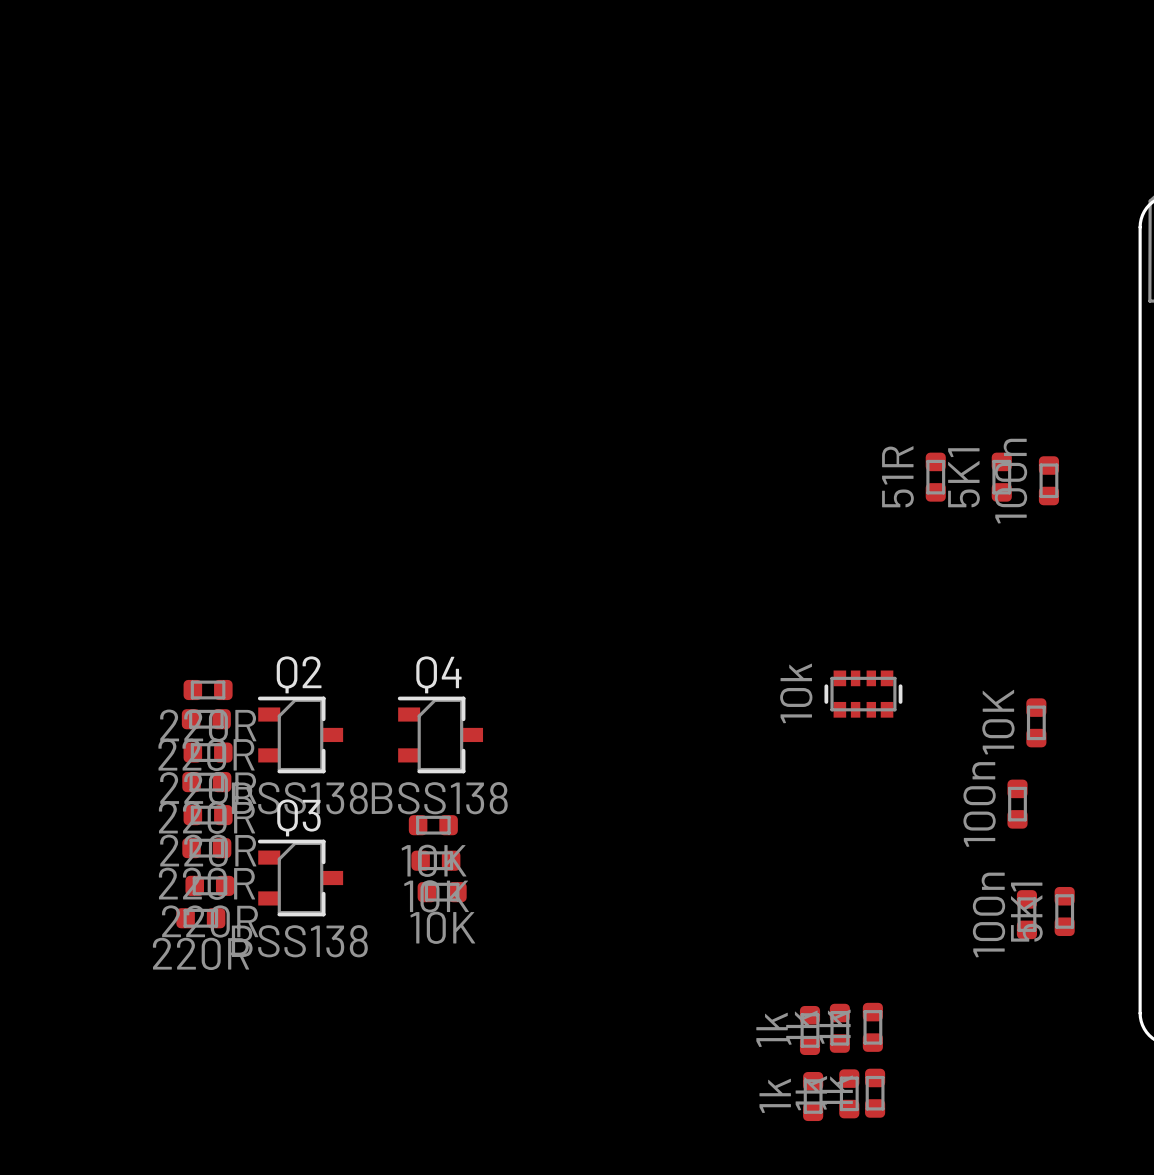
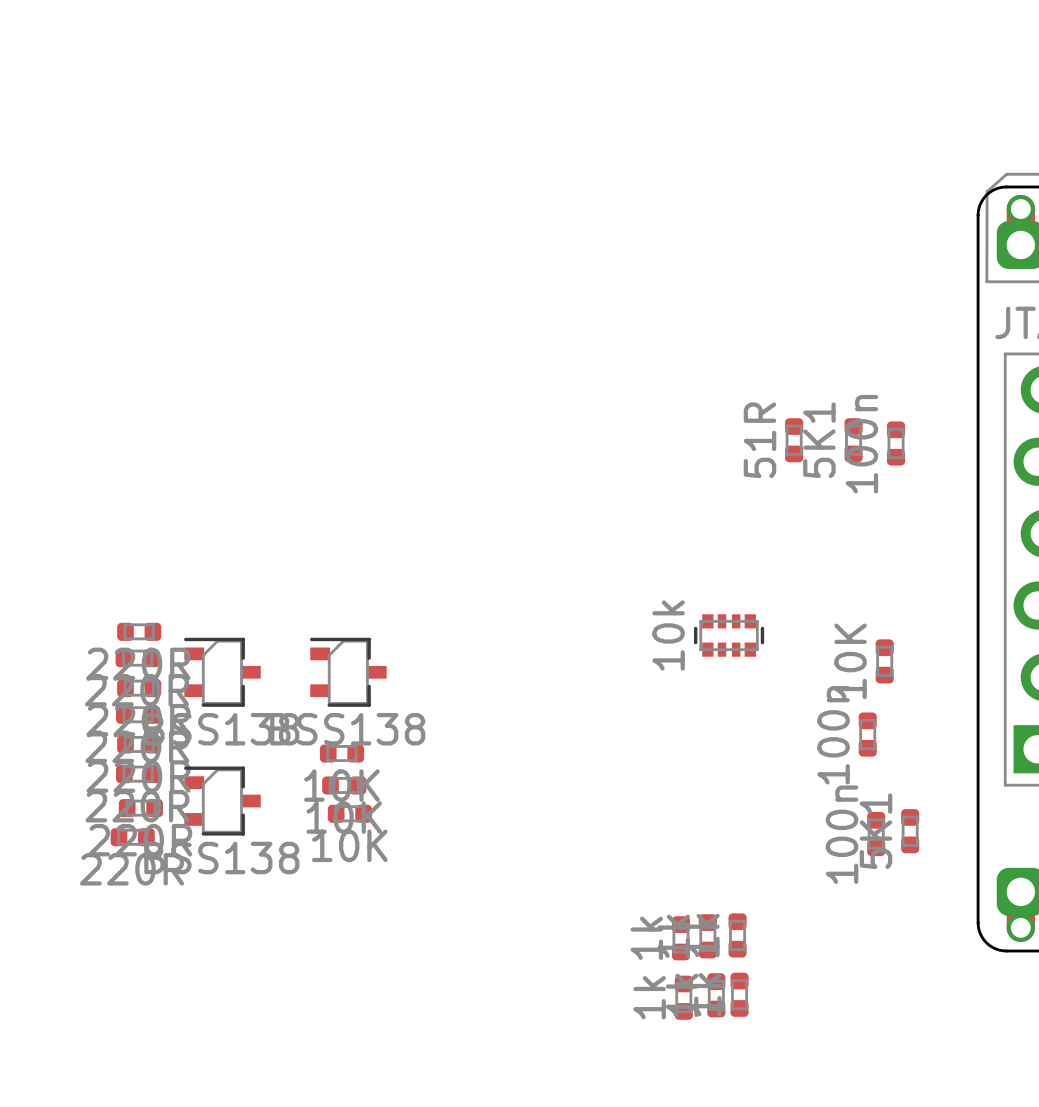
Q2 name: Q2 (299, 674) -> none
Q4 name: Q4 (438, 674) -> none
Q3 name: Q3 (298, 817) -> none

